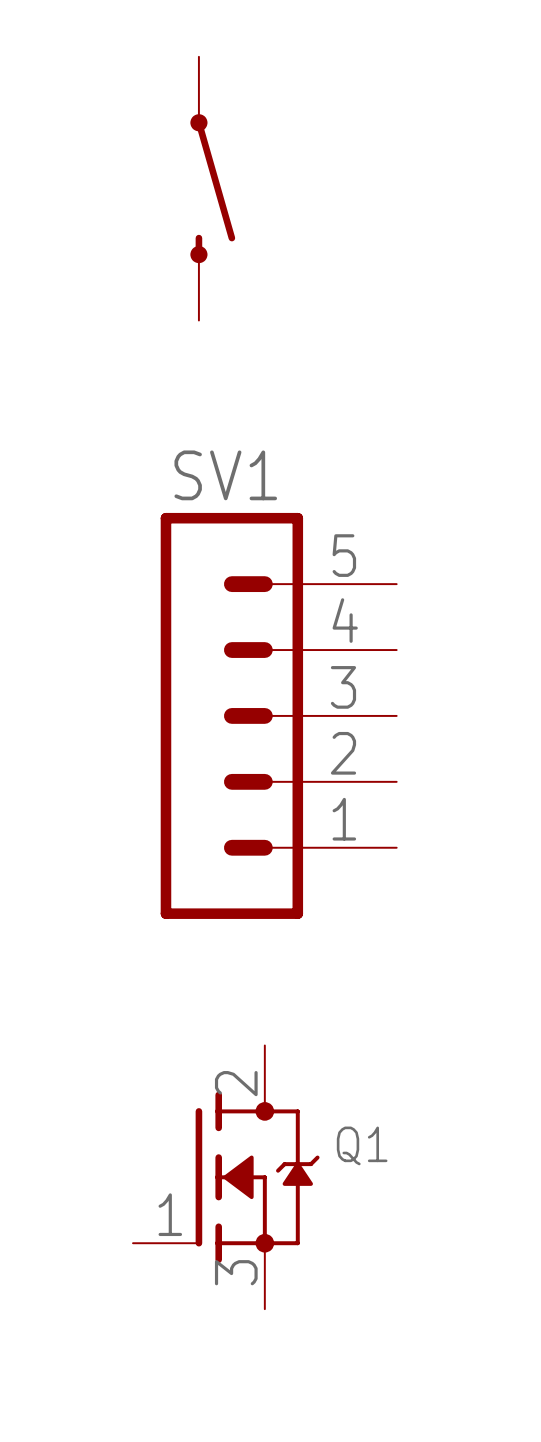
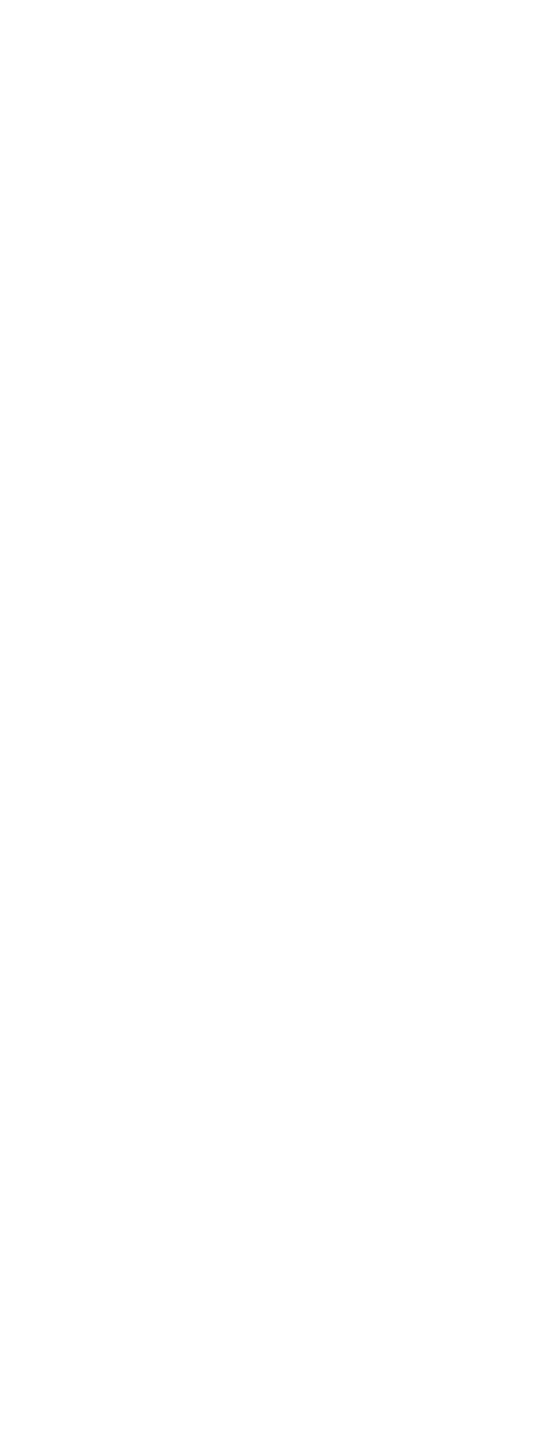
part: (212, 188) -> none
SV1: (278, 715) -> none
Q1: (226, 1177) -> none

